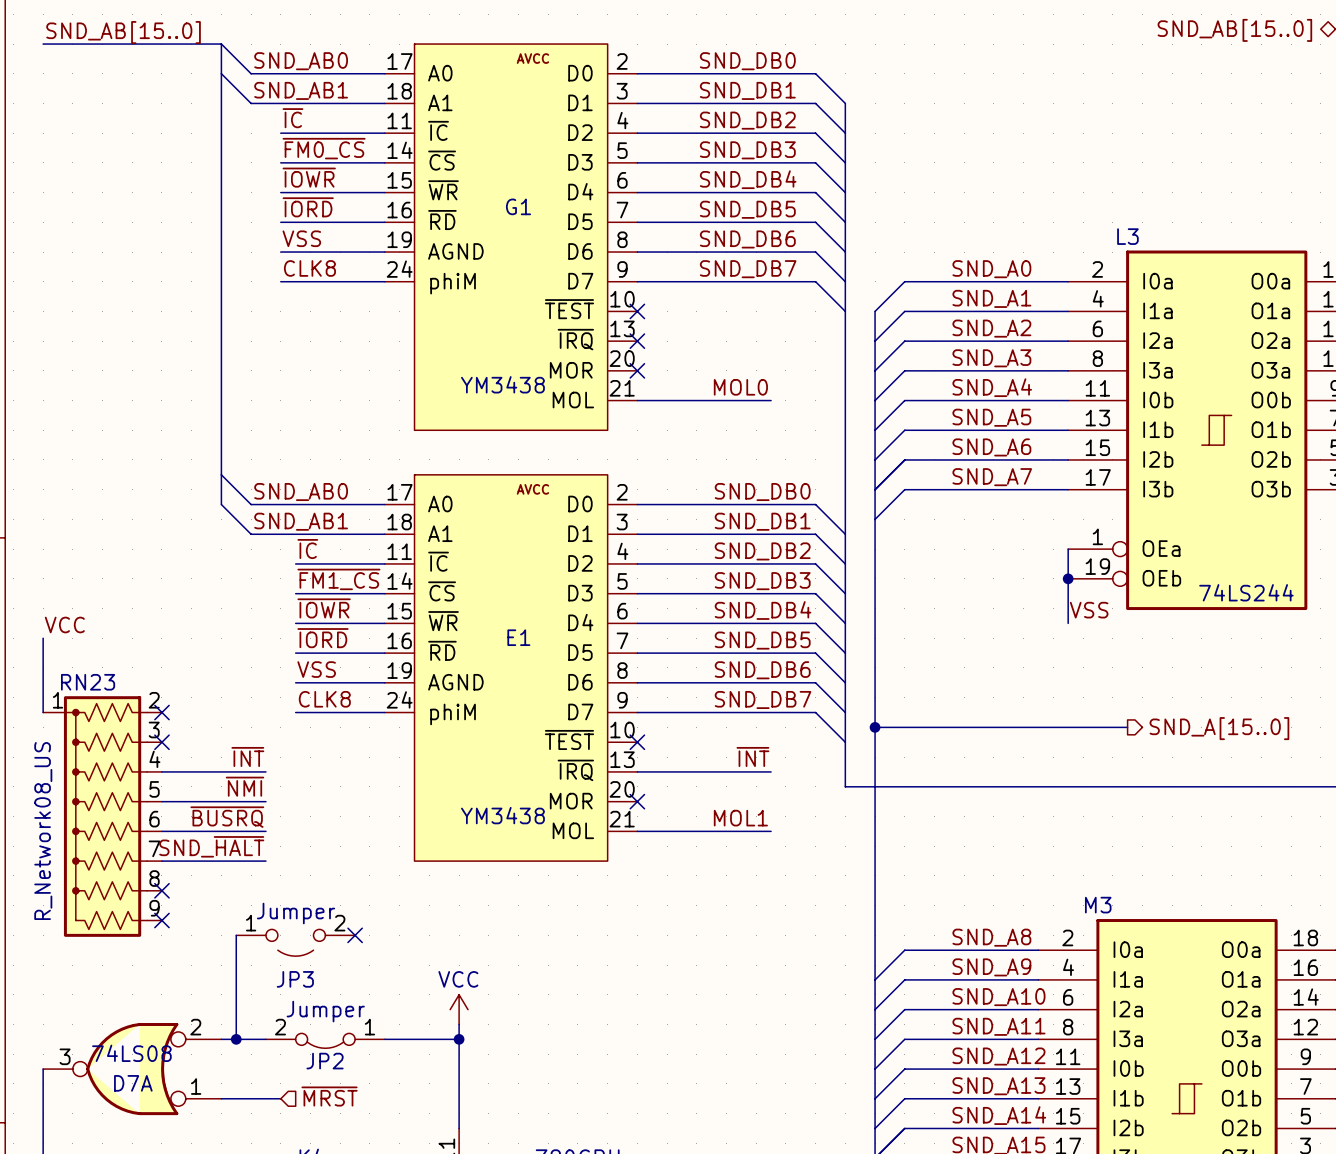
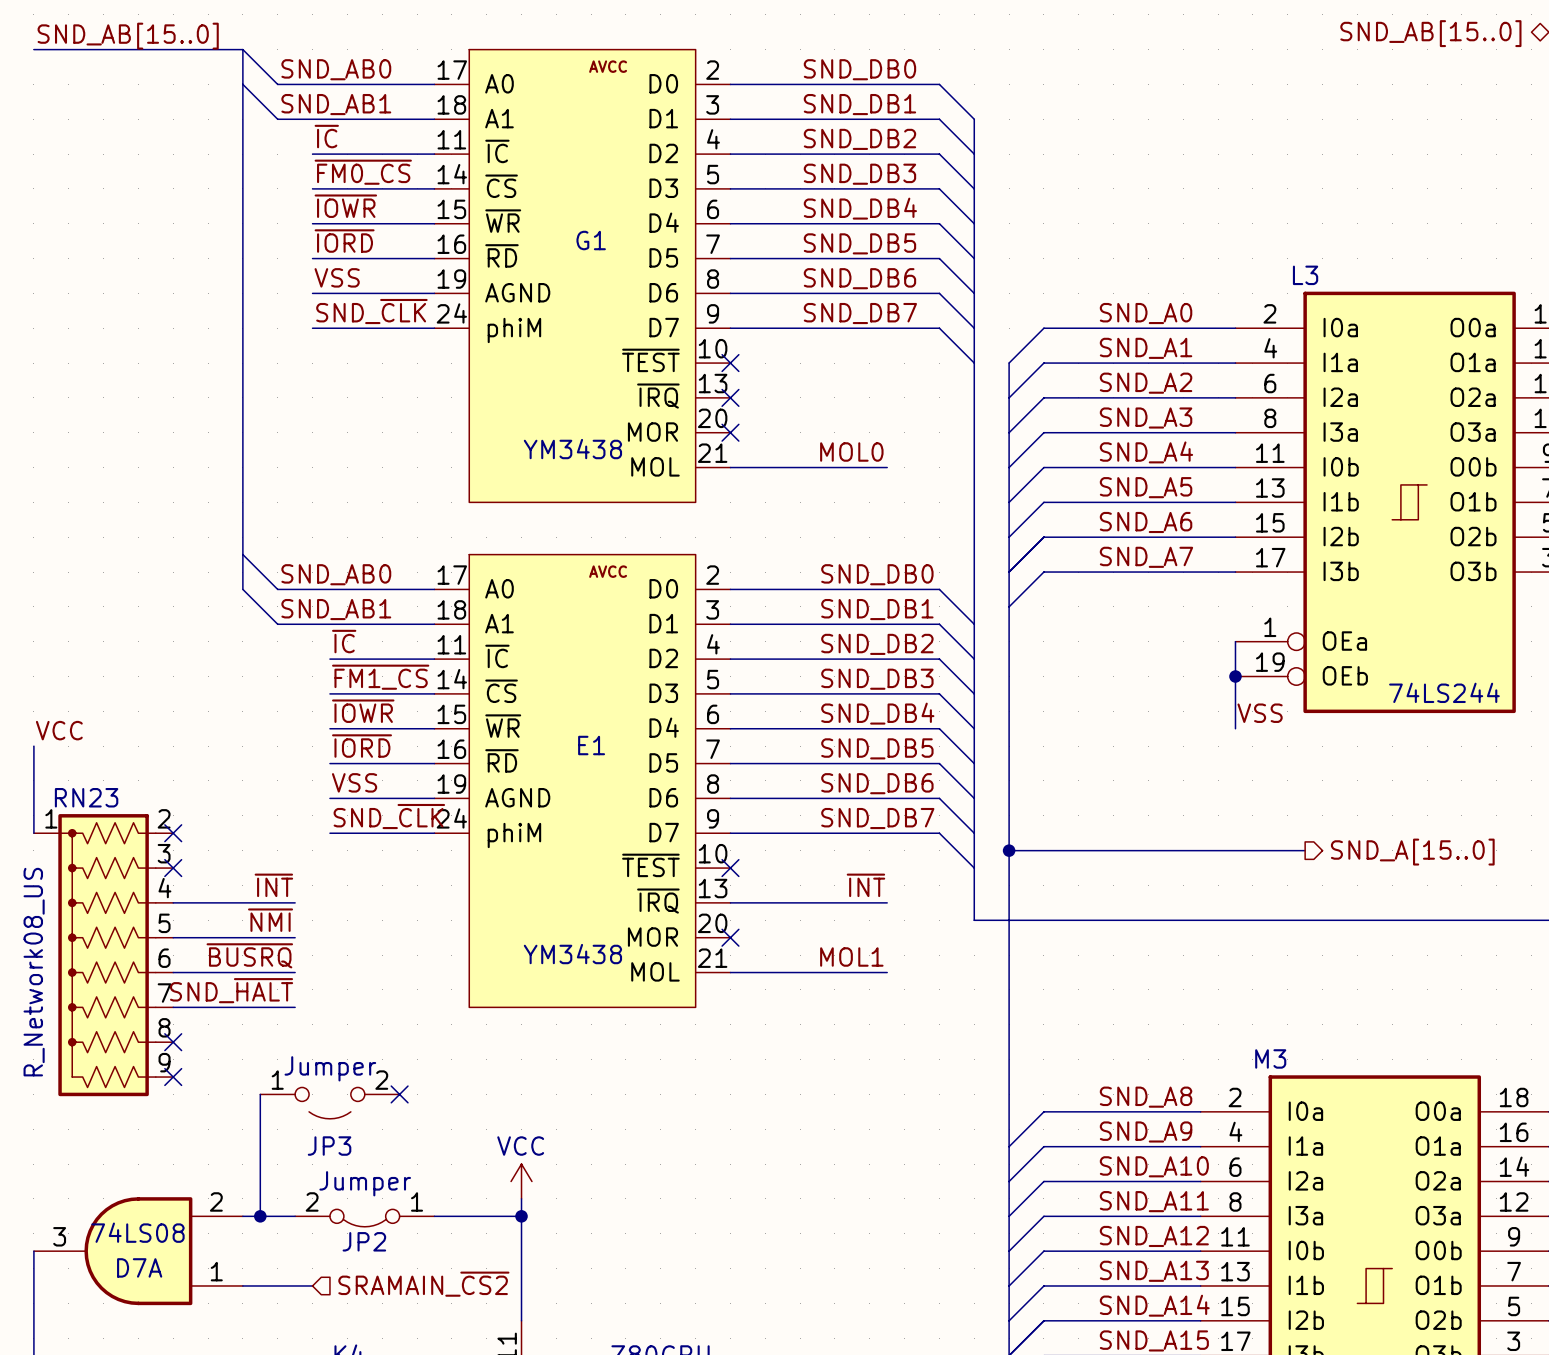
label: CLK8 (309, 268) -> SND_~{CLK} (371, 311)
label: CLK8 (324, 699) -> SND_~{CLK} (389, 816)
D7A symbol: [43, 1023, 222, 1116] -> [33, 1197, 243, 1306]
hierarchical label: ~{MRST} (329, 1096) -> SRAMAIN_~{CS2} (423, 1284)

